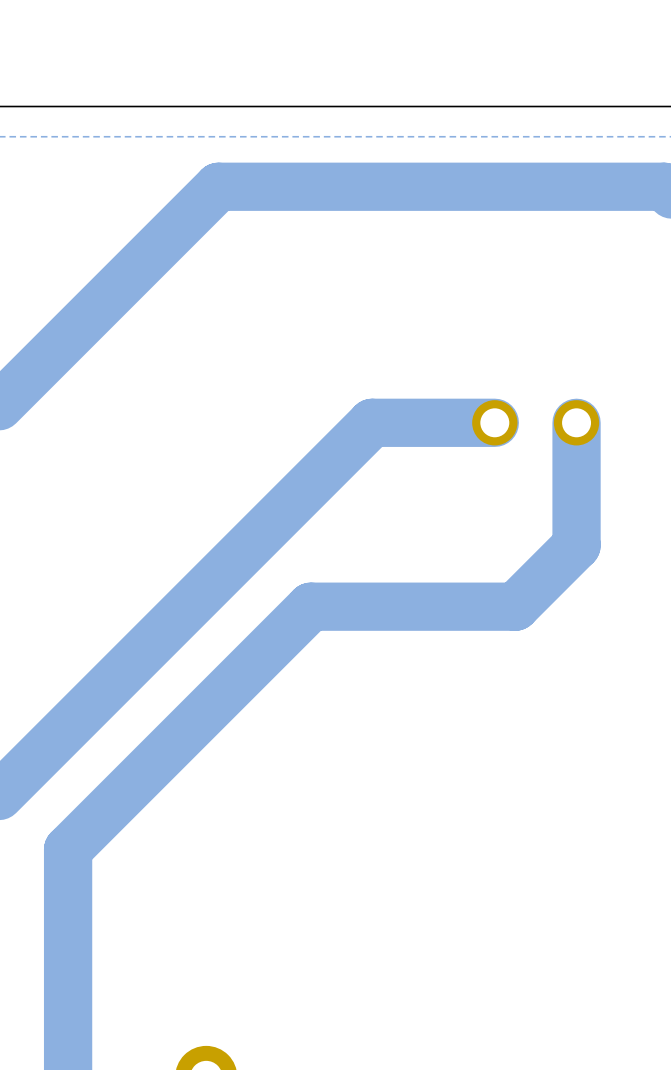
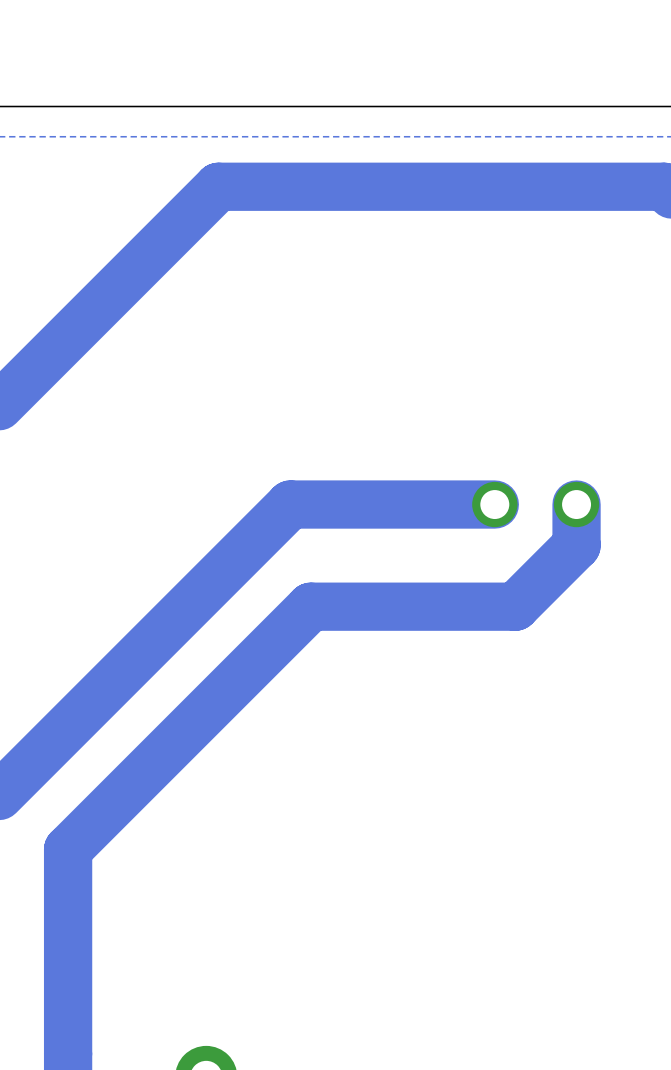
track: (494, 422) (372, 422) (290, 504) -> (494, 504) (290, 504)
part position: (535, 422) -> (535, 504)
track: (576, 422) (576, 504) -> none

